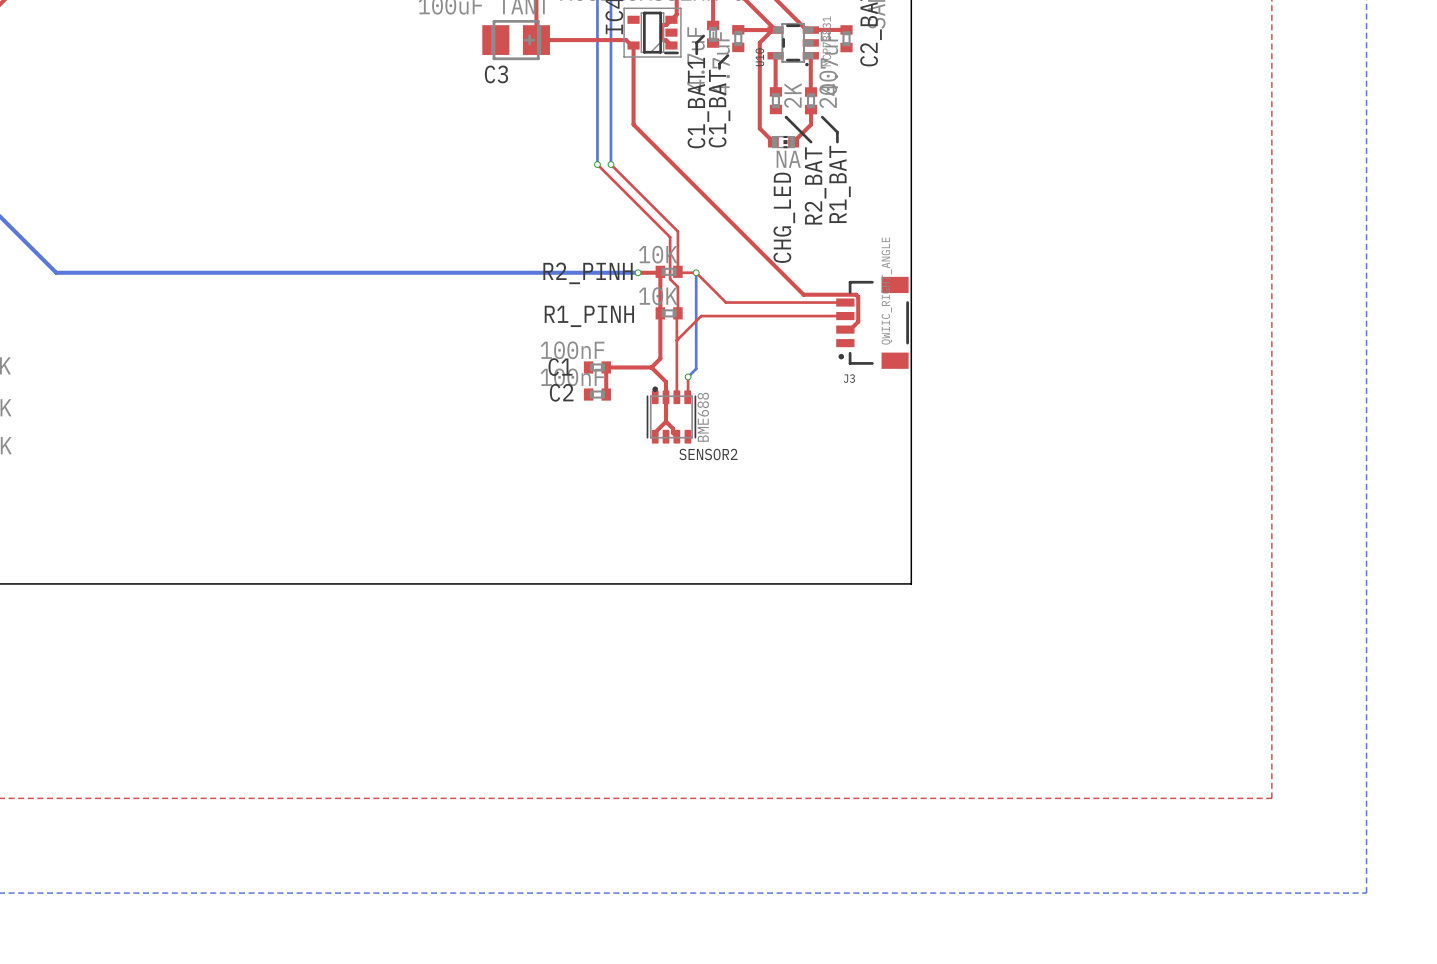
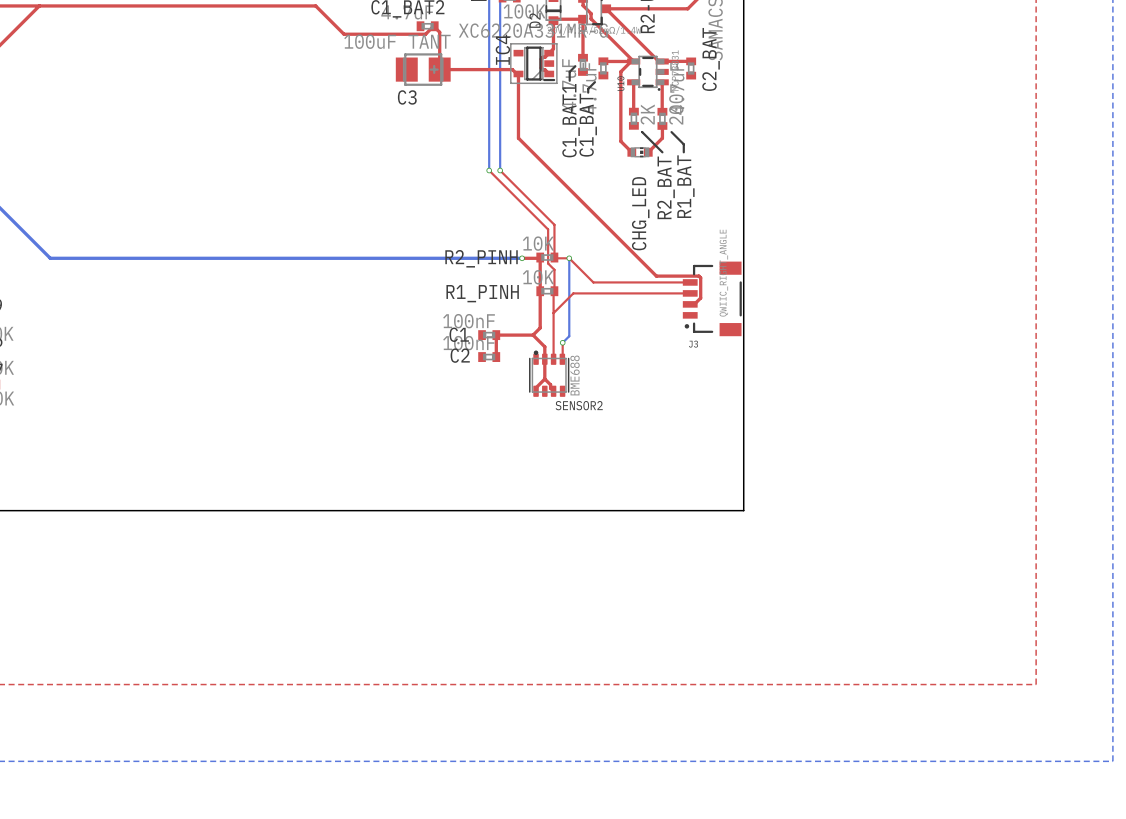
CHG_LED value: NA (788, 159) -> none

